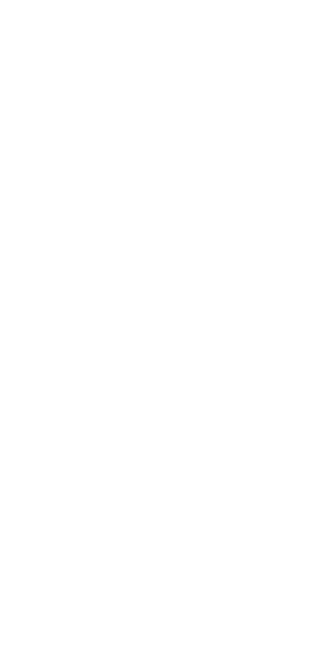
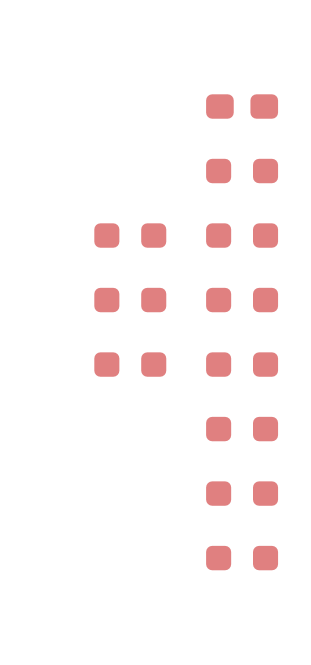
part: none -> (242, 106)
part: none -> (242, 171)
part: none -> (130, 235)
part: none -> (242, 235)
part: none -> (130, 300)
part: none -> (242, 300)
part: none -> (130, 364)
part: none -> (242, 364)
part: none -> (242, 429)
part: none -> (242, 493)
part: none -> (242, 558)

